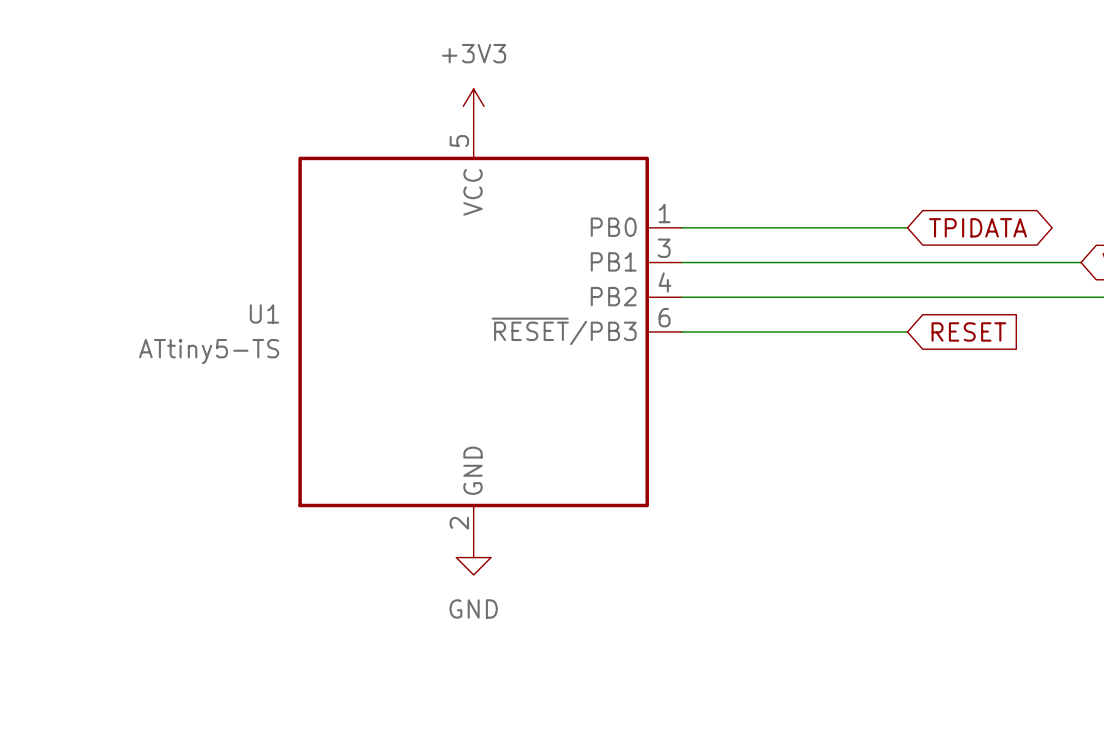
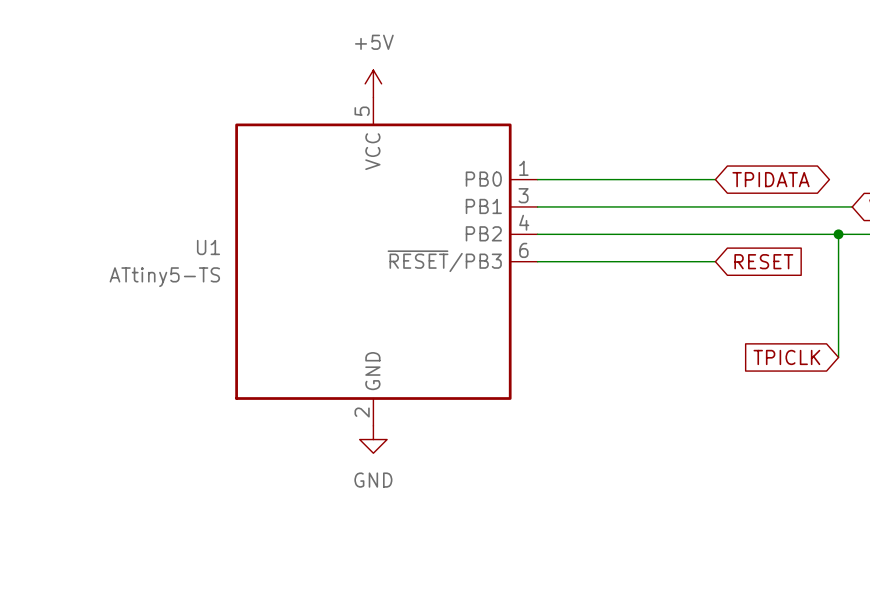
power symbol: +3V3 (473, 106) -> +5V (373, 83)
wire: none -> (838, 234) (838, 357)
junction: none -> (838, 234)
global label: none -> TPICLK (786, 357)

